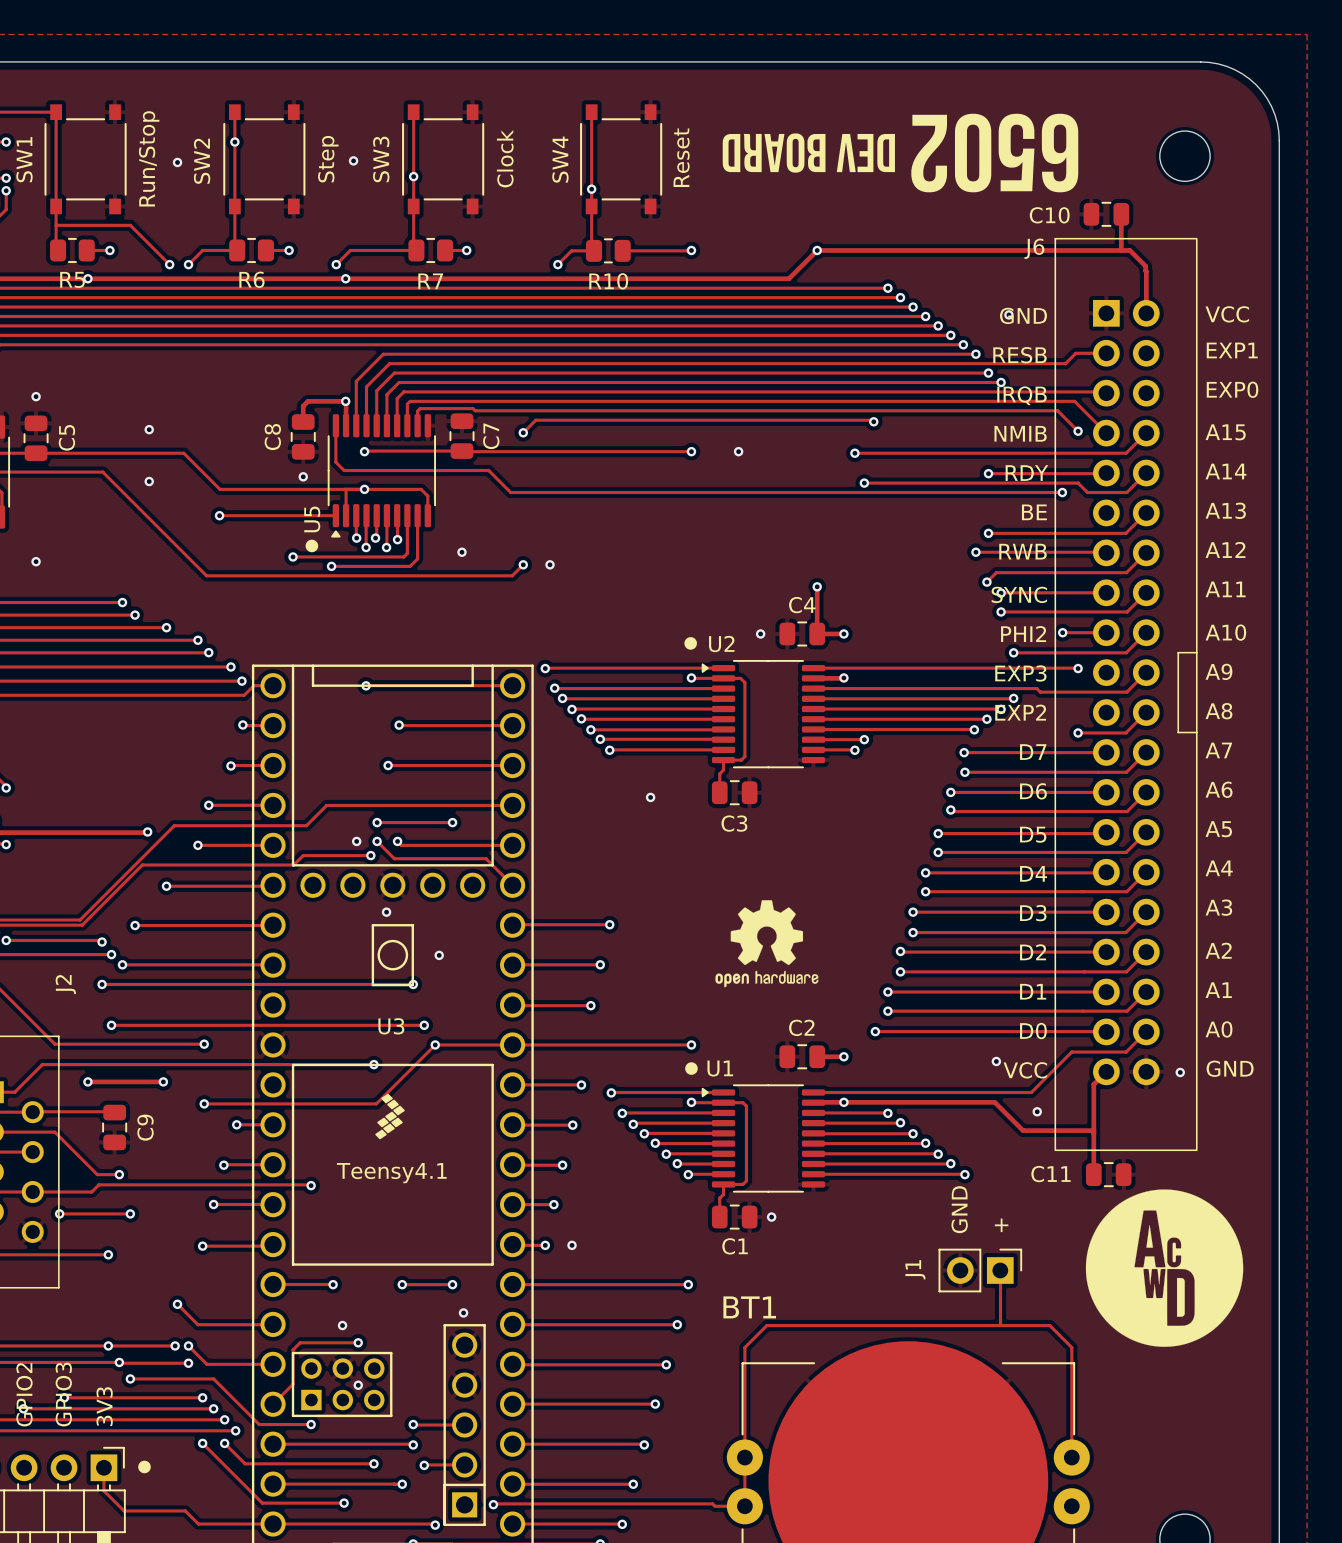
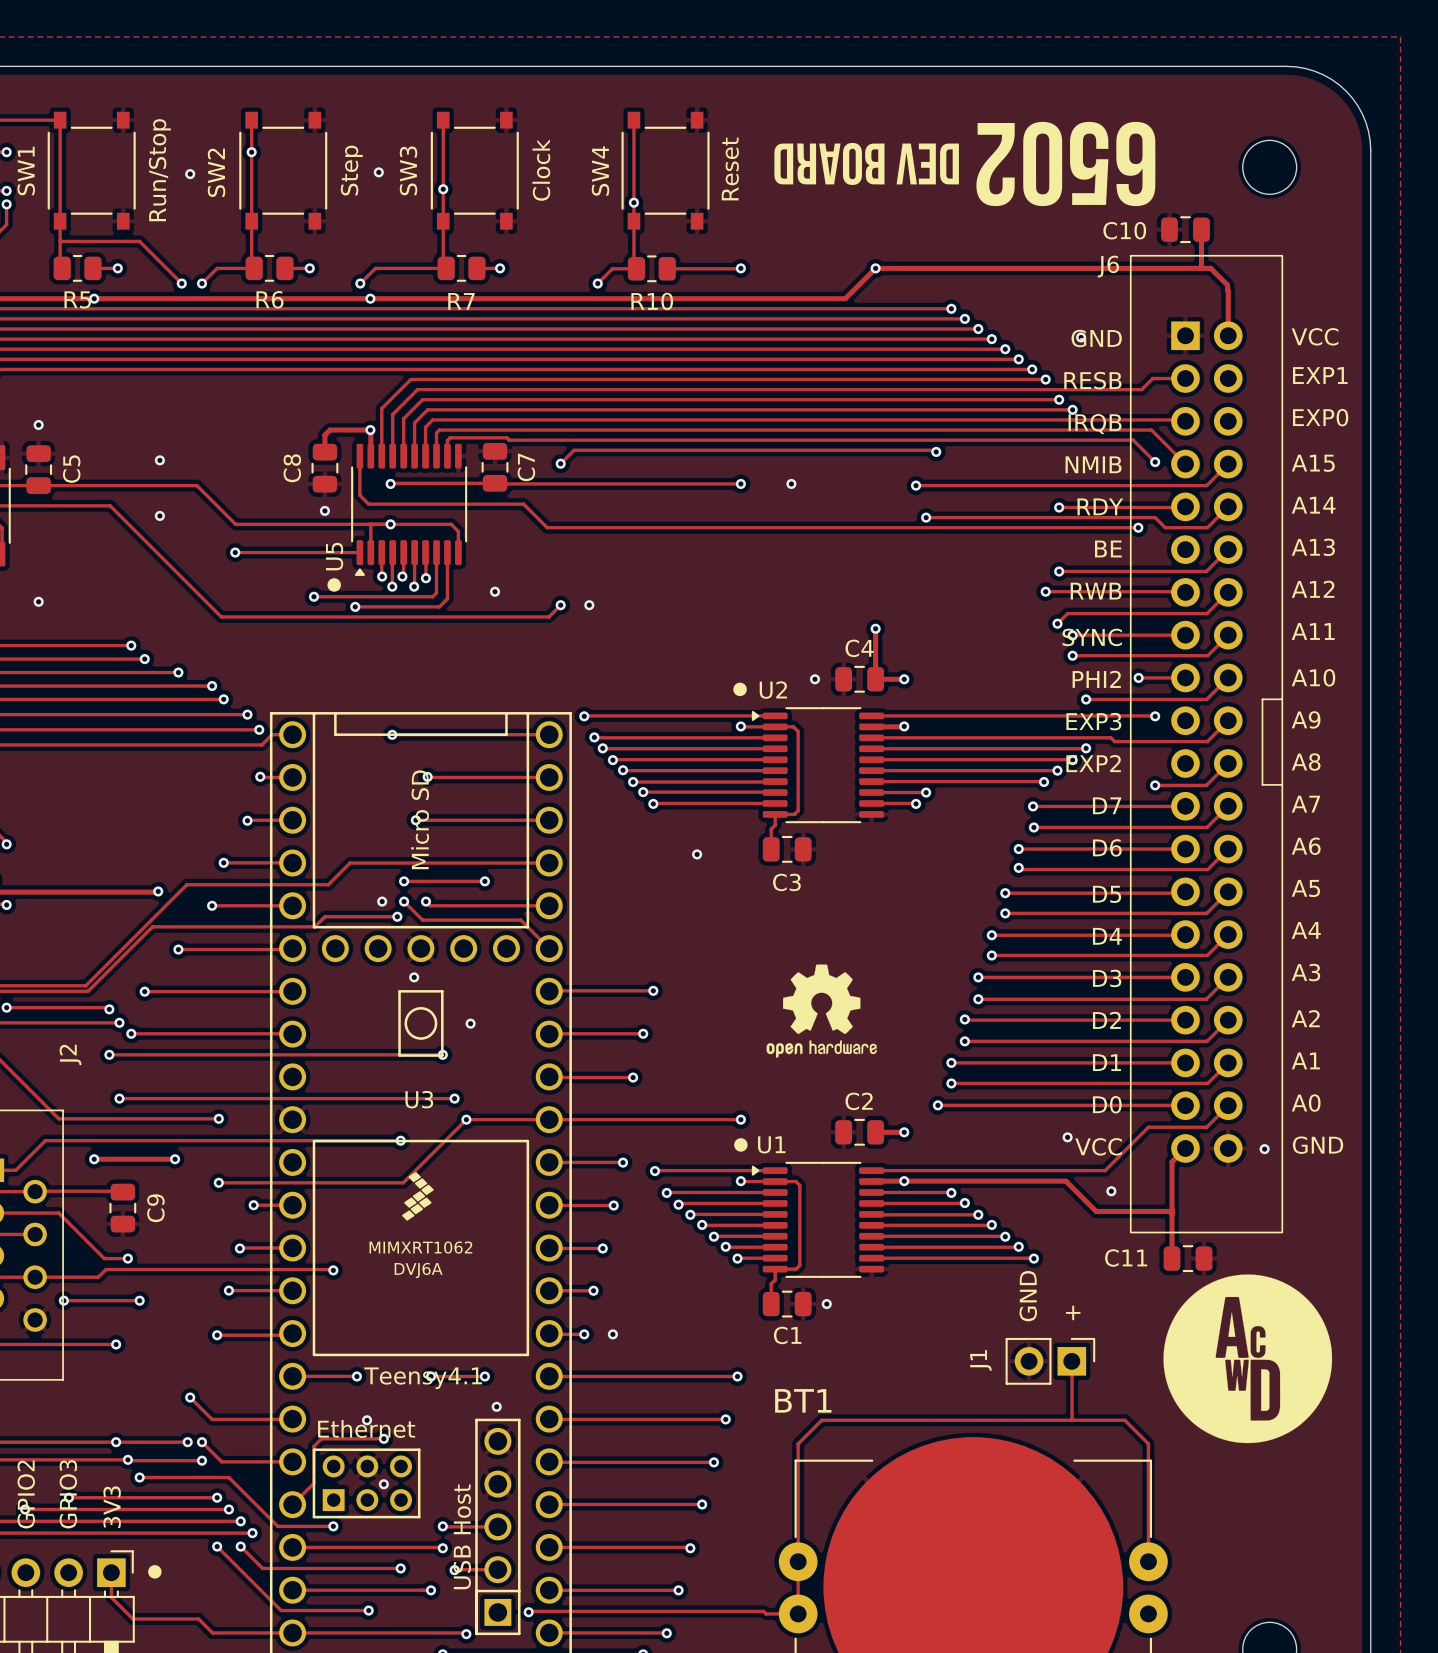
U3 text: none -> Micro SD (420, 819)
U3 text: none -> MIMXRT1062 (420, 1247)
U3 value position: Teensy4.1 (391, 1173) -> Teensy4.1 (423, 1378)
U3 text: none -> DVJ6A (418, 1270)
U3 text: none -> Ethernet (366, 1428)
U3 text: none -> USB Host (462, 1536)

